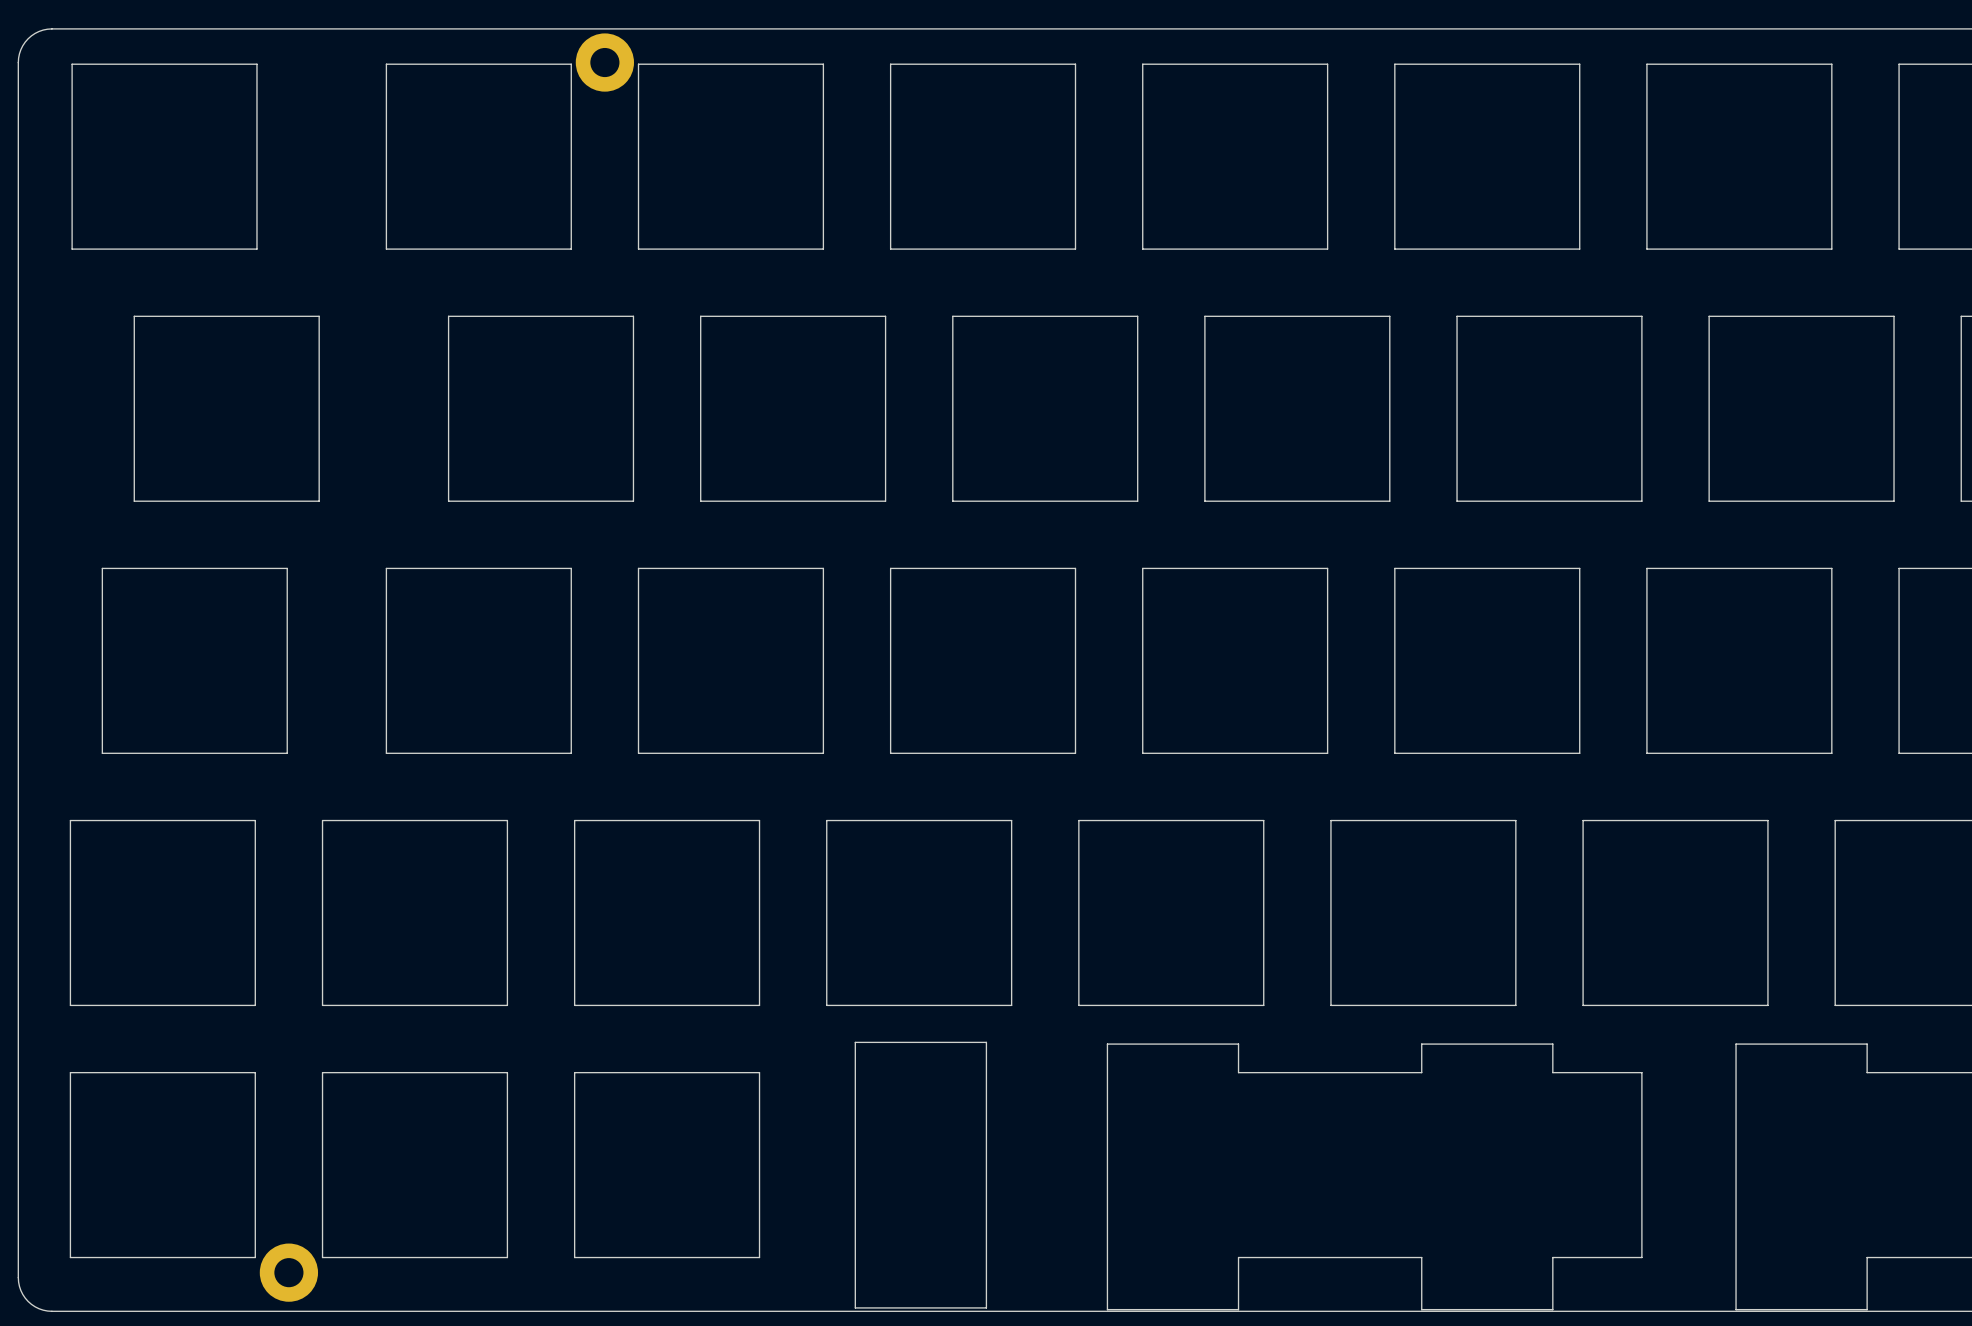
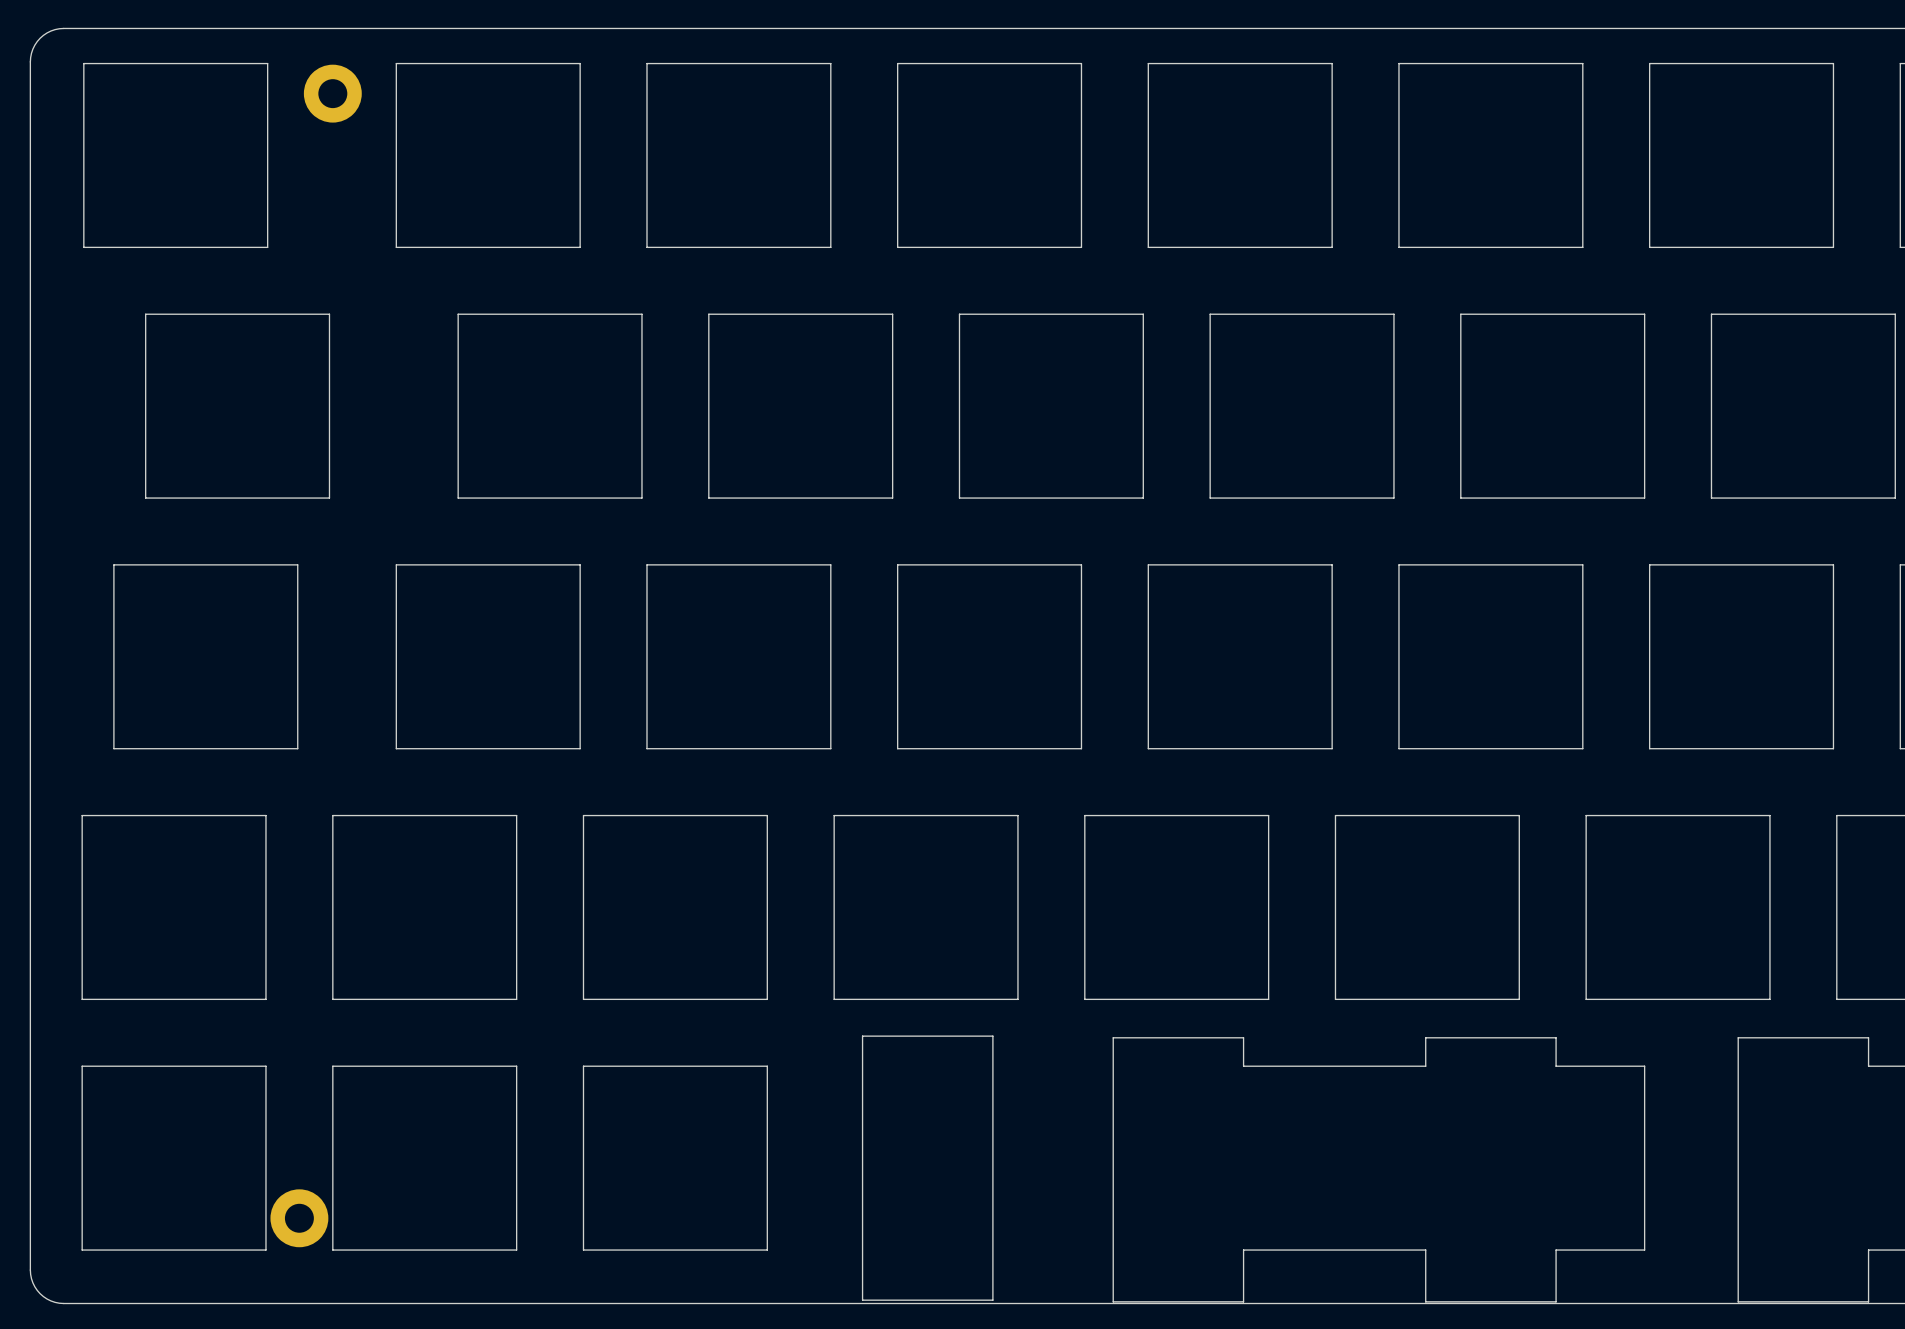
part position: (604, 62) -> (332, 93)
part position: (288, 1272) -> (299, 1218)

